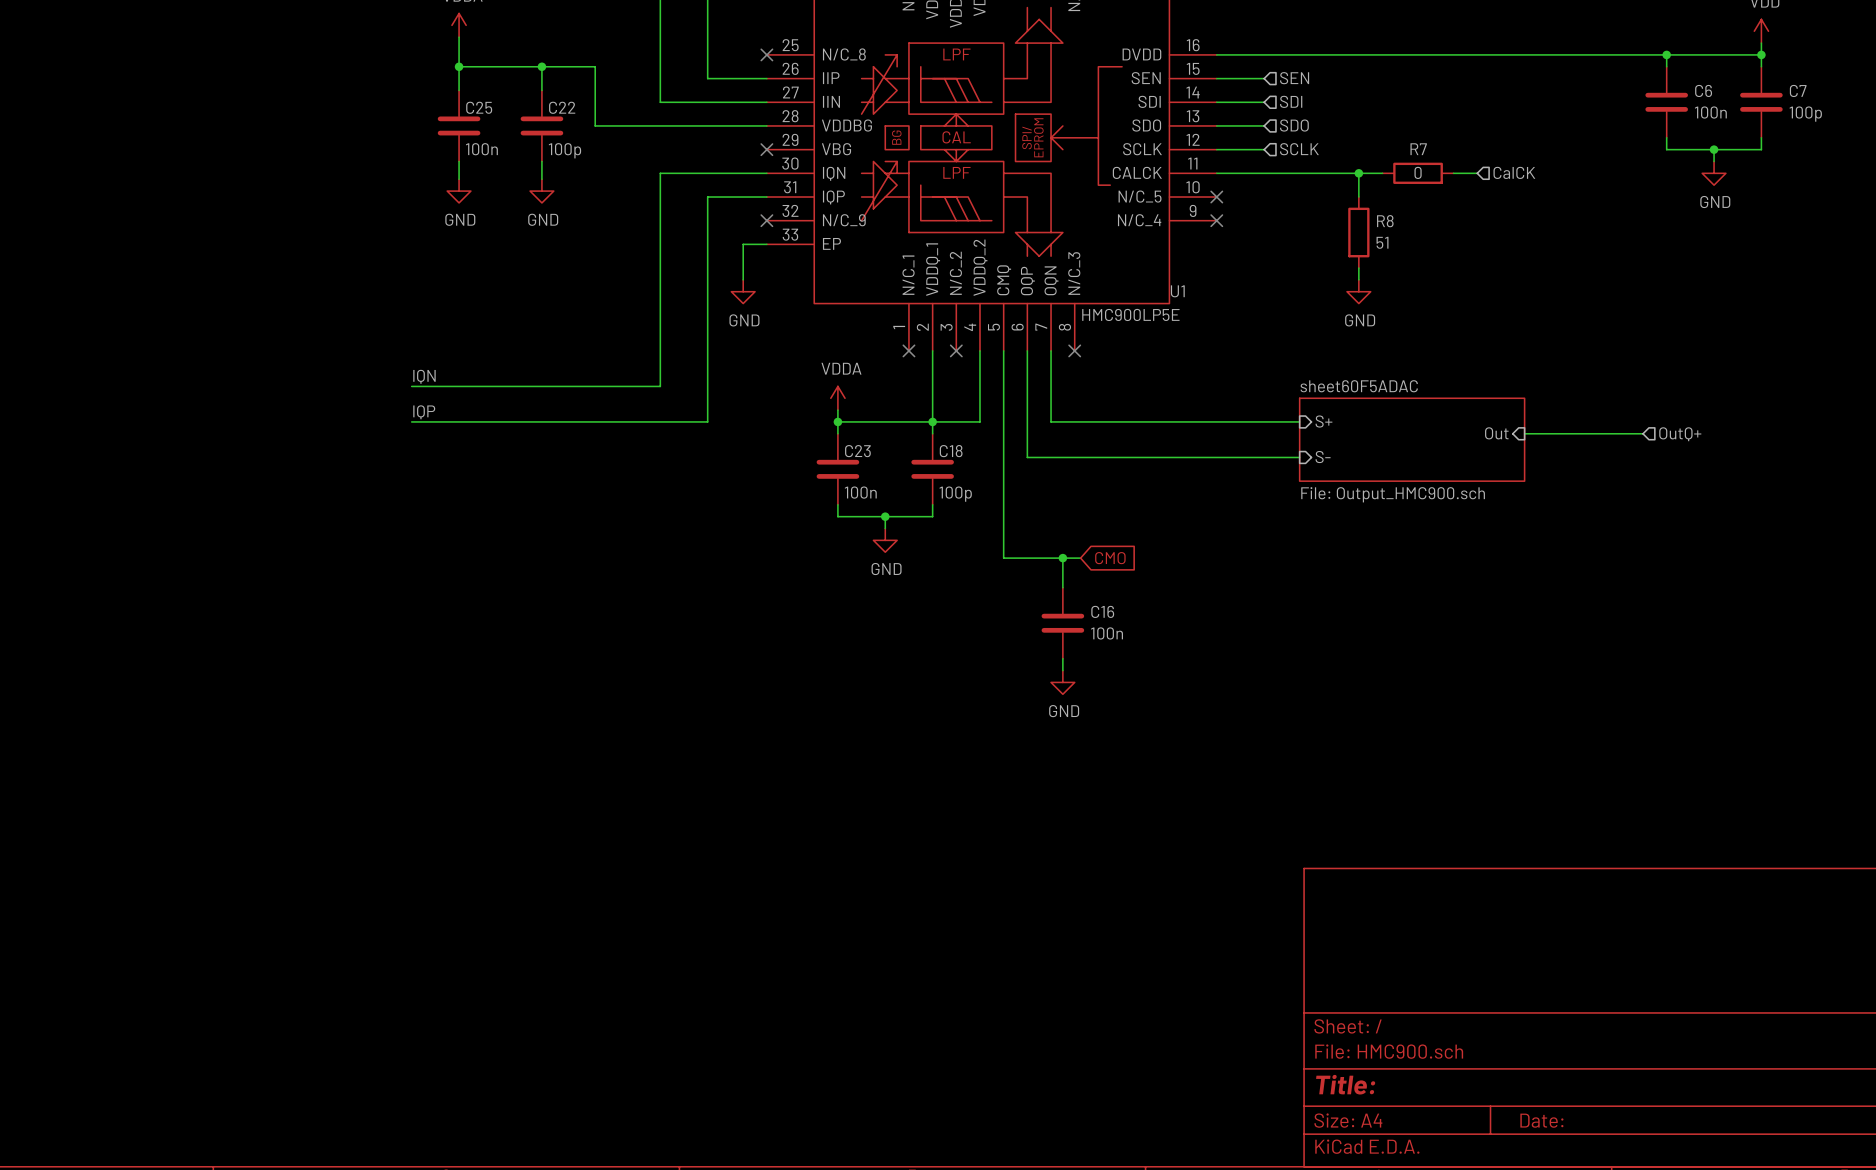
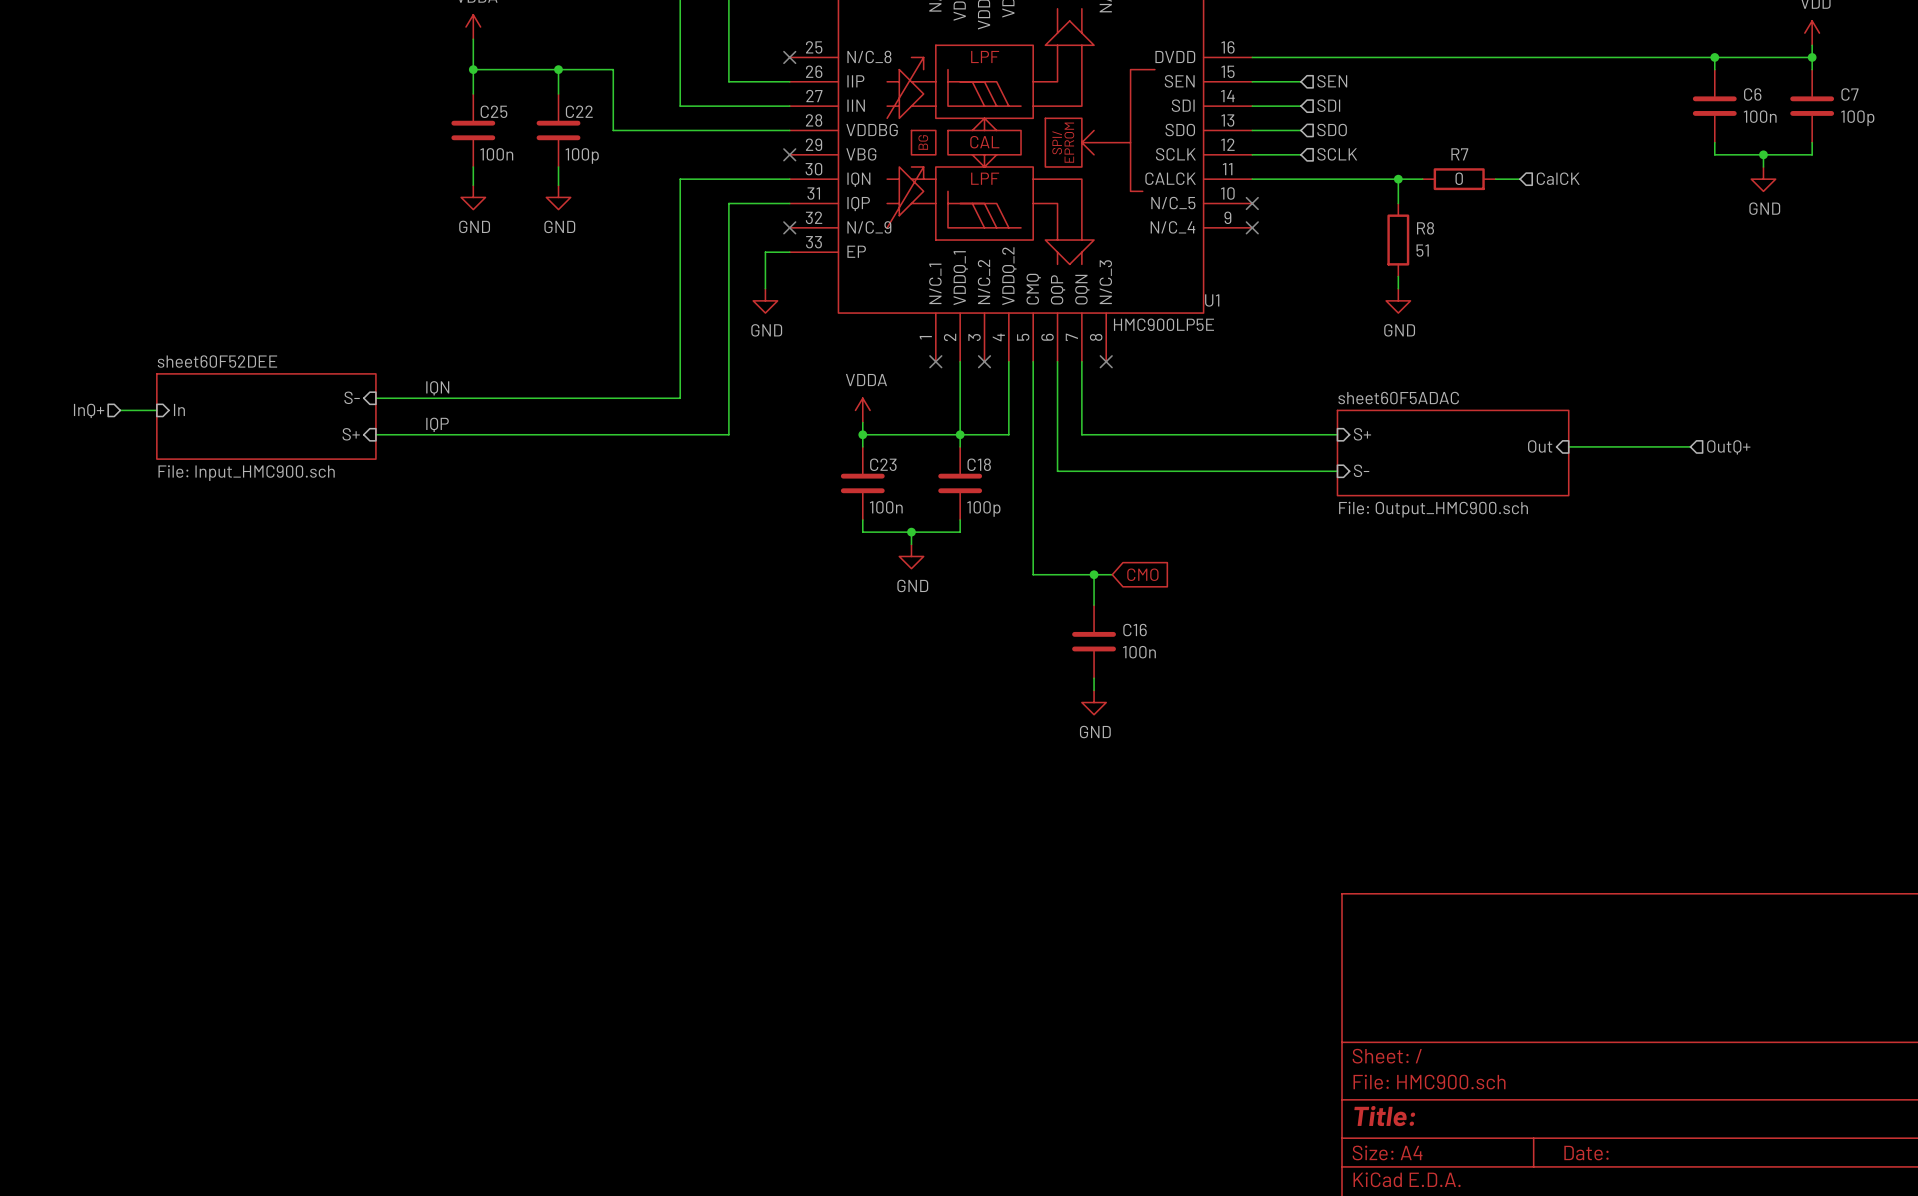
sheet pin: none -> S- (352, 397)
wire: none -> (375, 398) (424, 398)
sheet pin: none -> In (179, 409)
hierarchical label: none -> InQ+ (89, 410)
wire: none -> (120, 410) (156, 410)
sheet sheet60F52DEE: none -> File: Input_HMC900.sch (266, 416)
sheet pin: none -> S+ (351, 434)
wire: none -> (375, 434) (424, 434)

